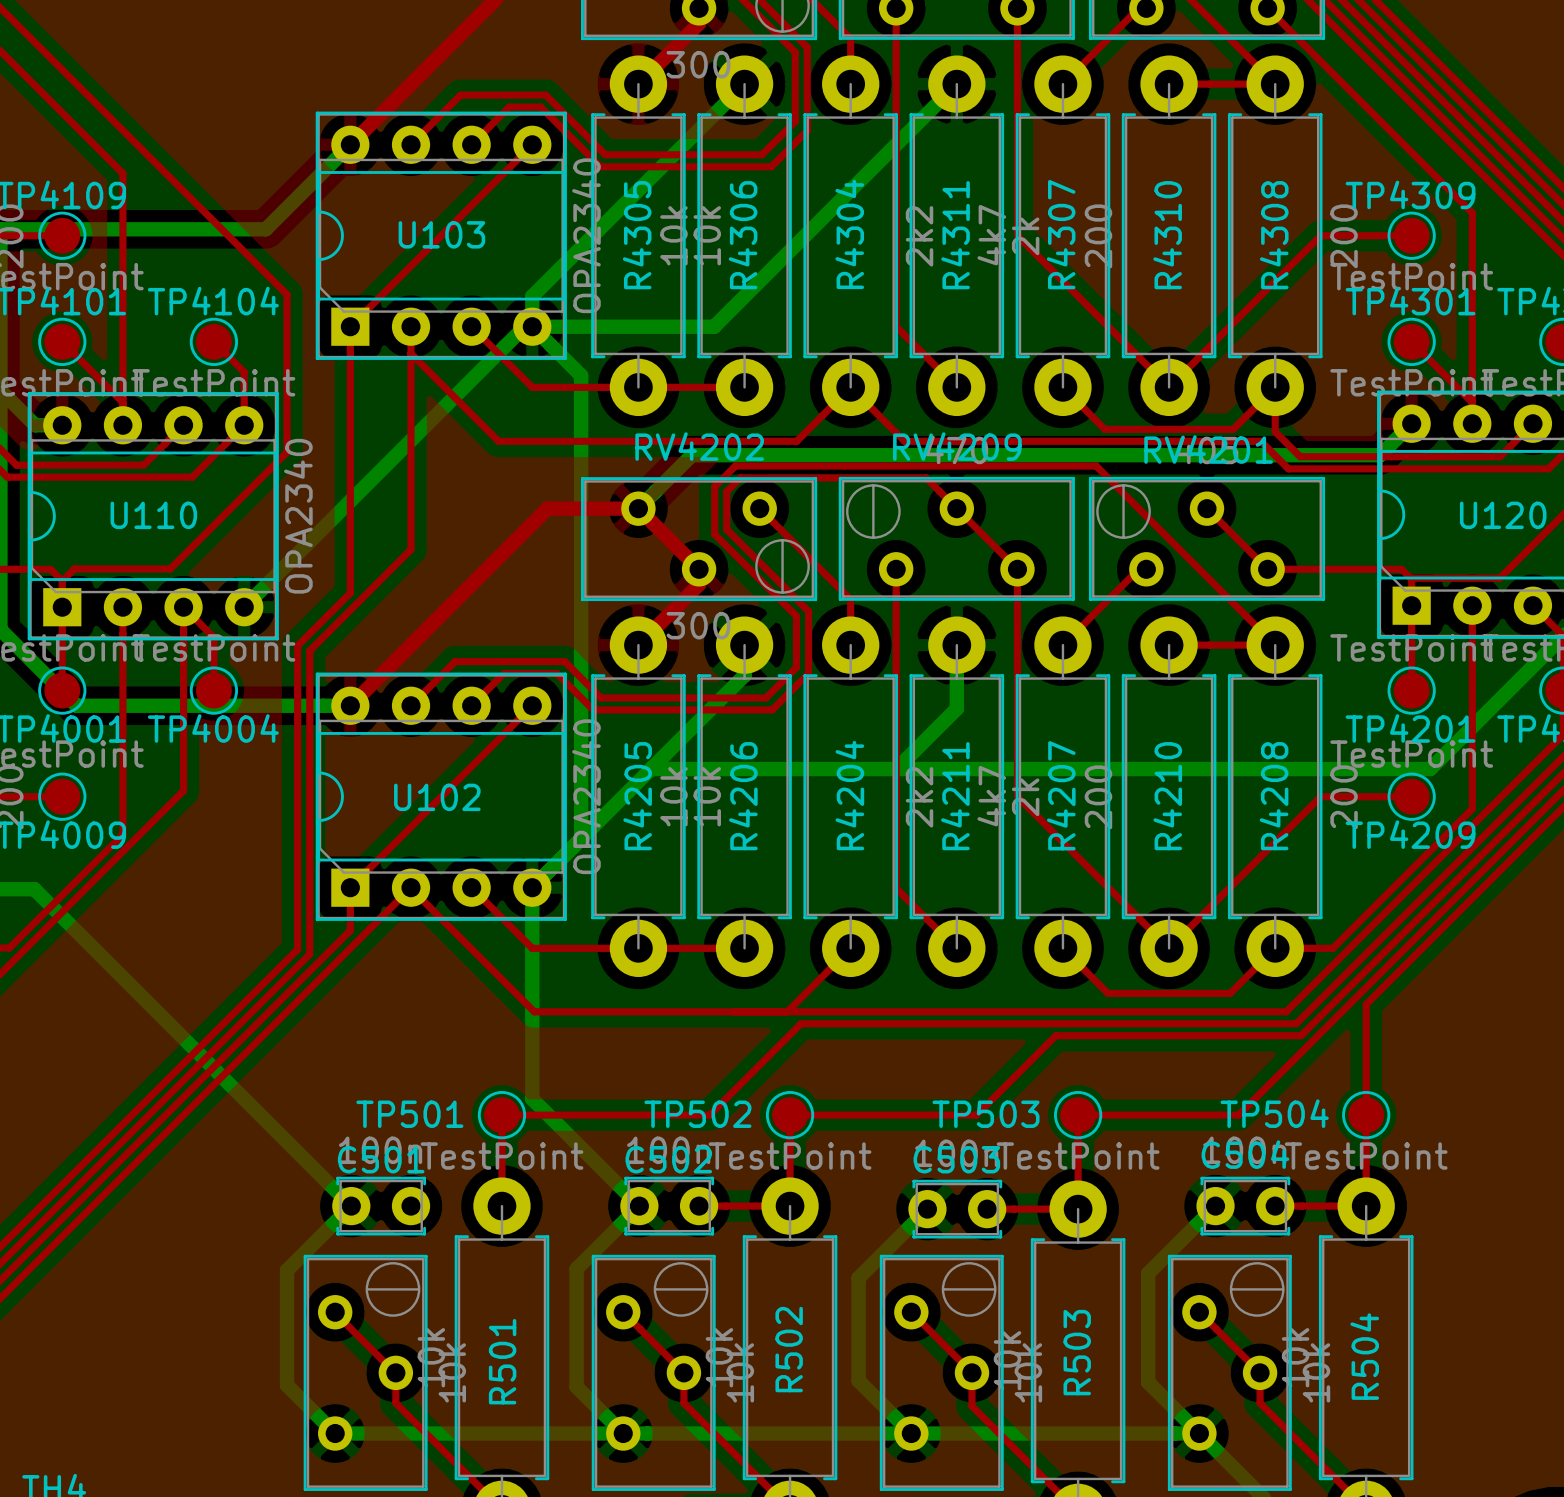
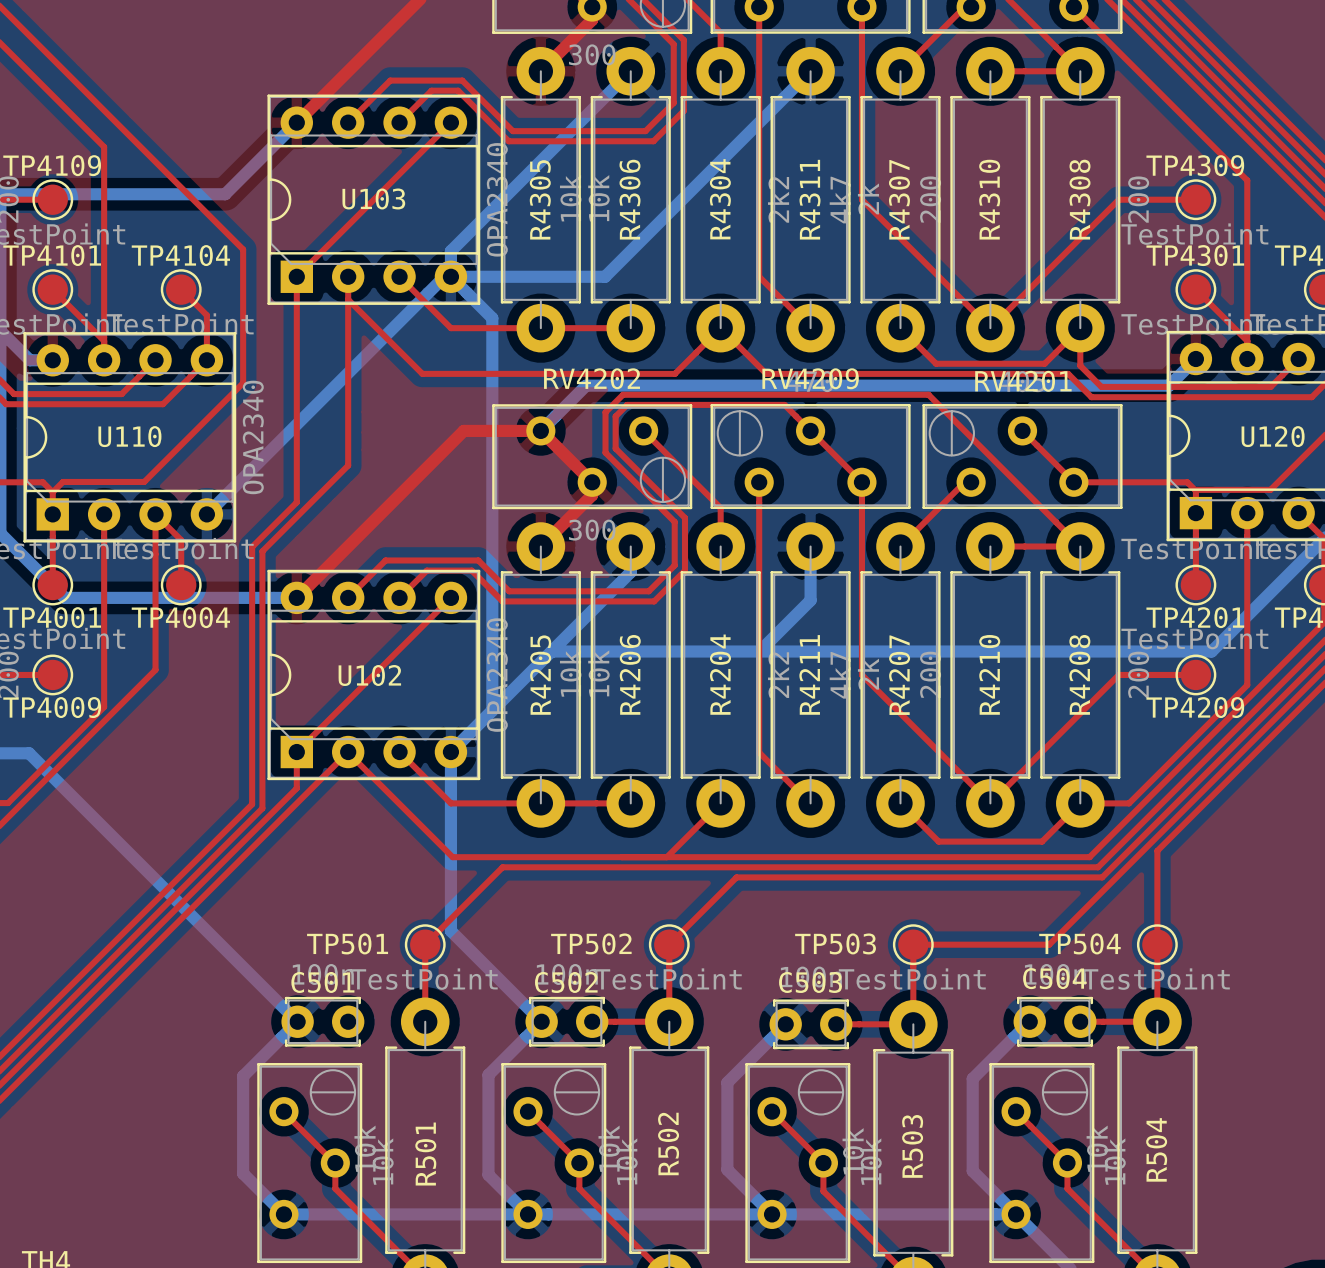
top track: (800, 1023) (709, 1115) (501, 1115) -> (678, 867) (502, 867) (425, 944)
top track: (1055, 1035) (976, 1115) (790, 1115) -> (894, 877) (736, 877) (669, 944)

